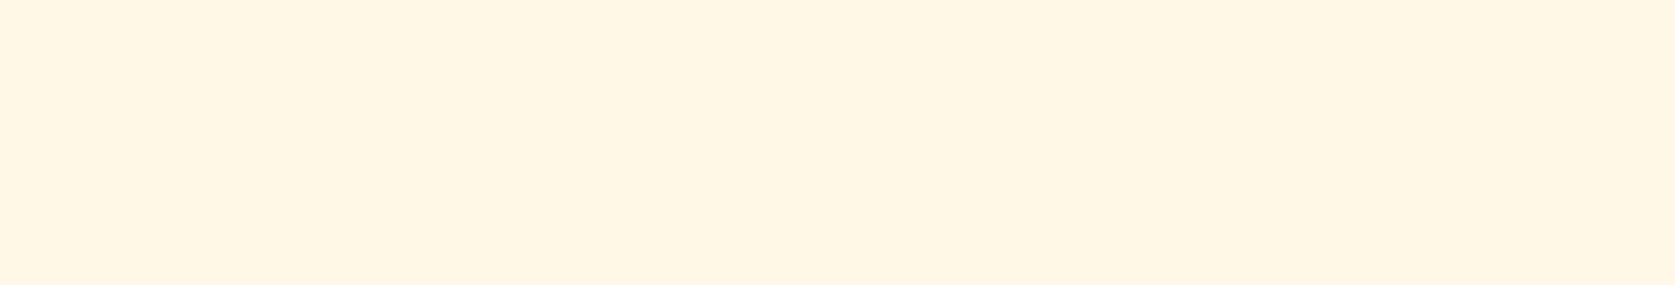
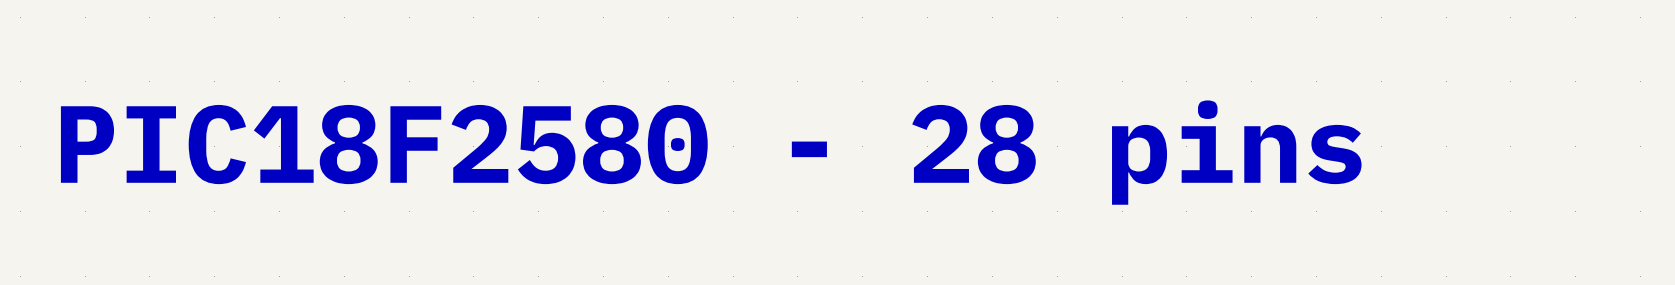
text: none -> PIC18F2580 - 28 pins (711, 152)

